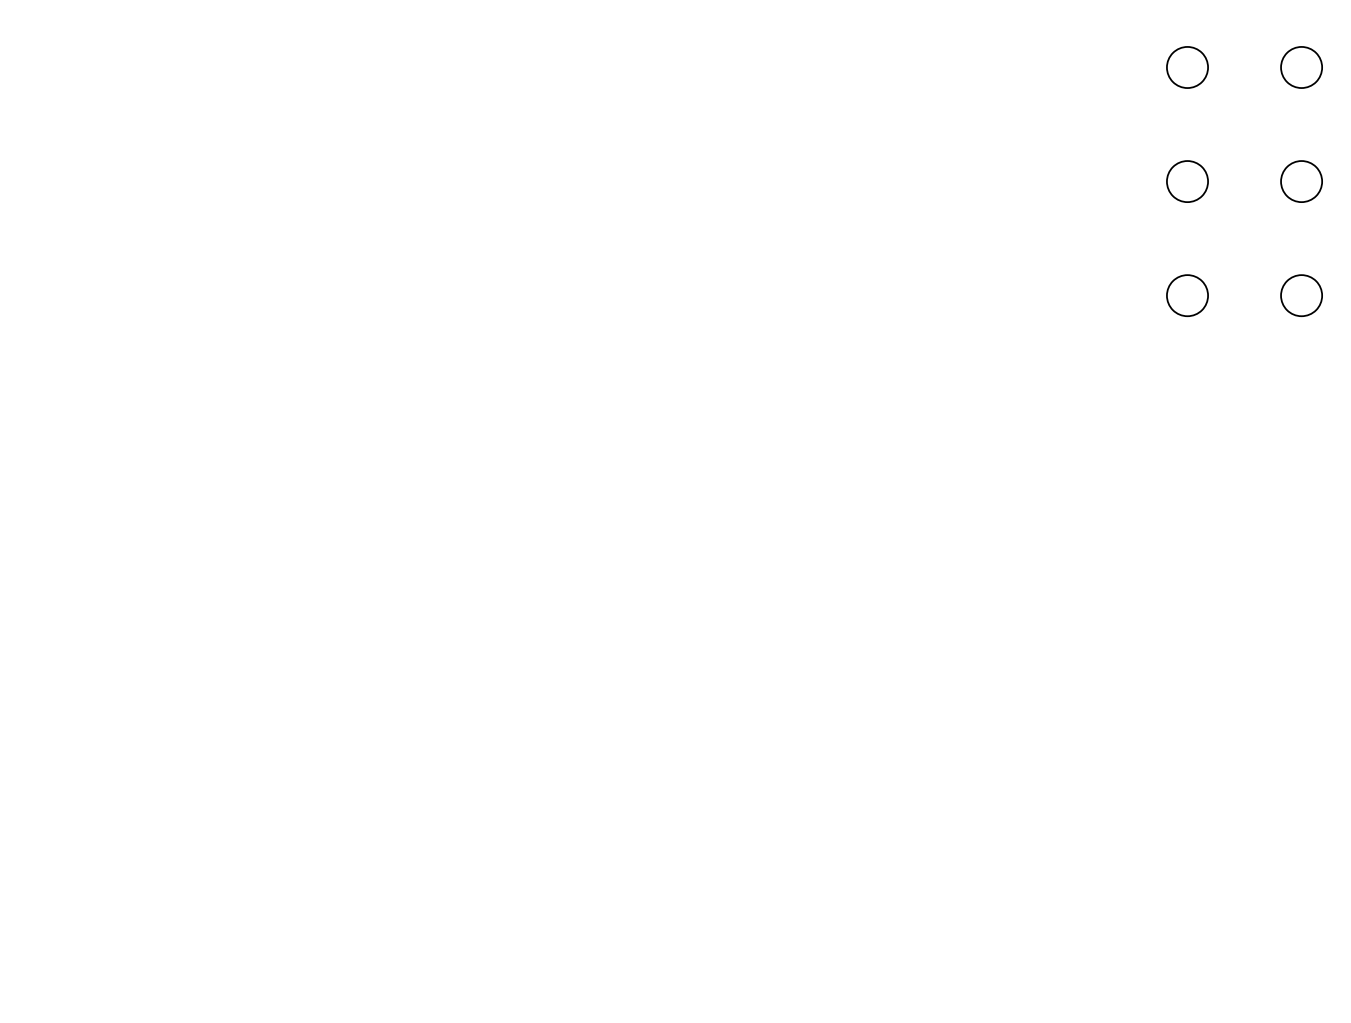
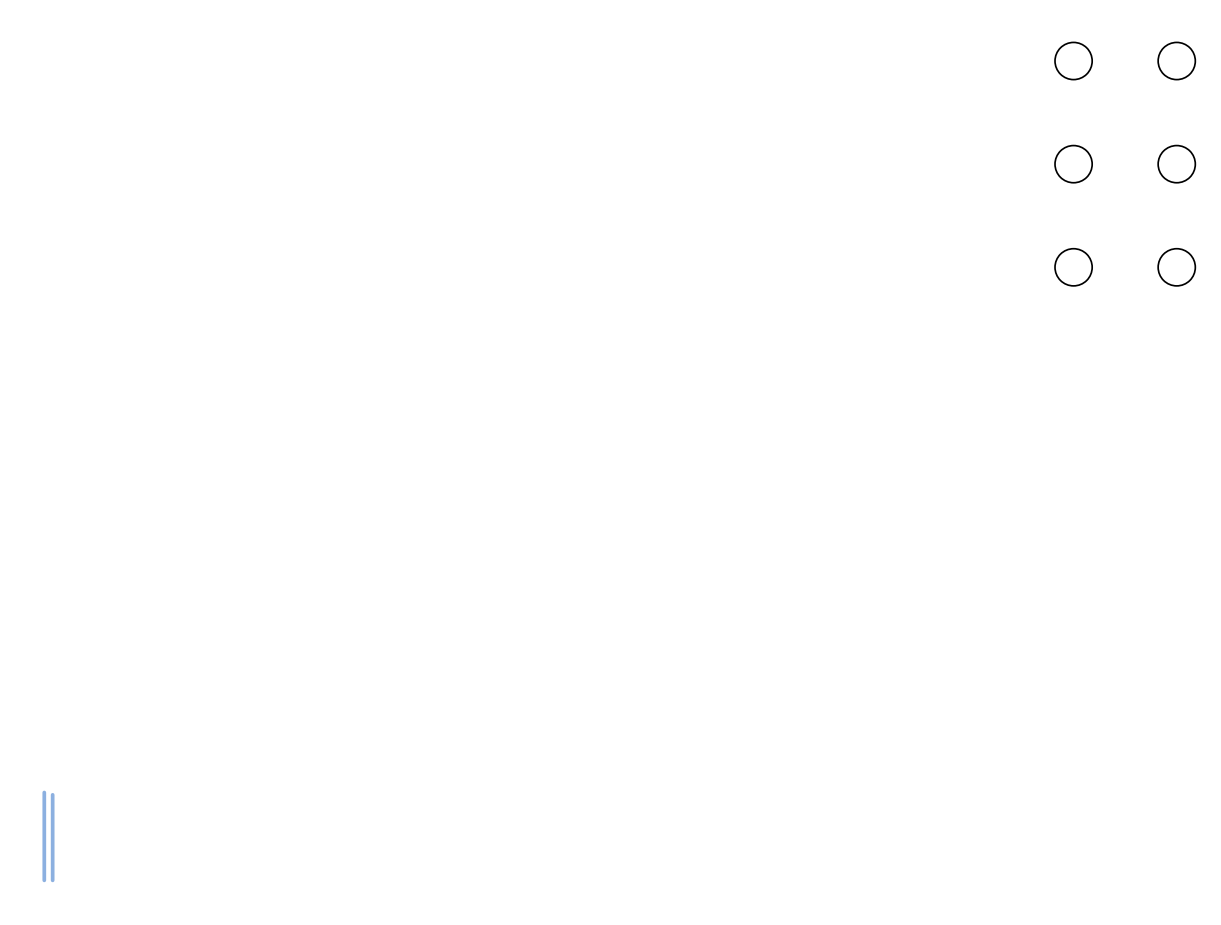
track: none -> (44, 792) (44, 880)
track: none -> (52, 794) (52, 880)

